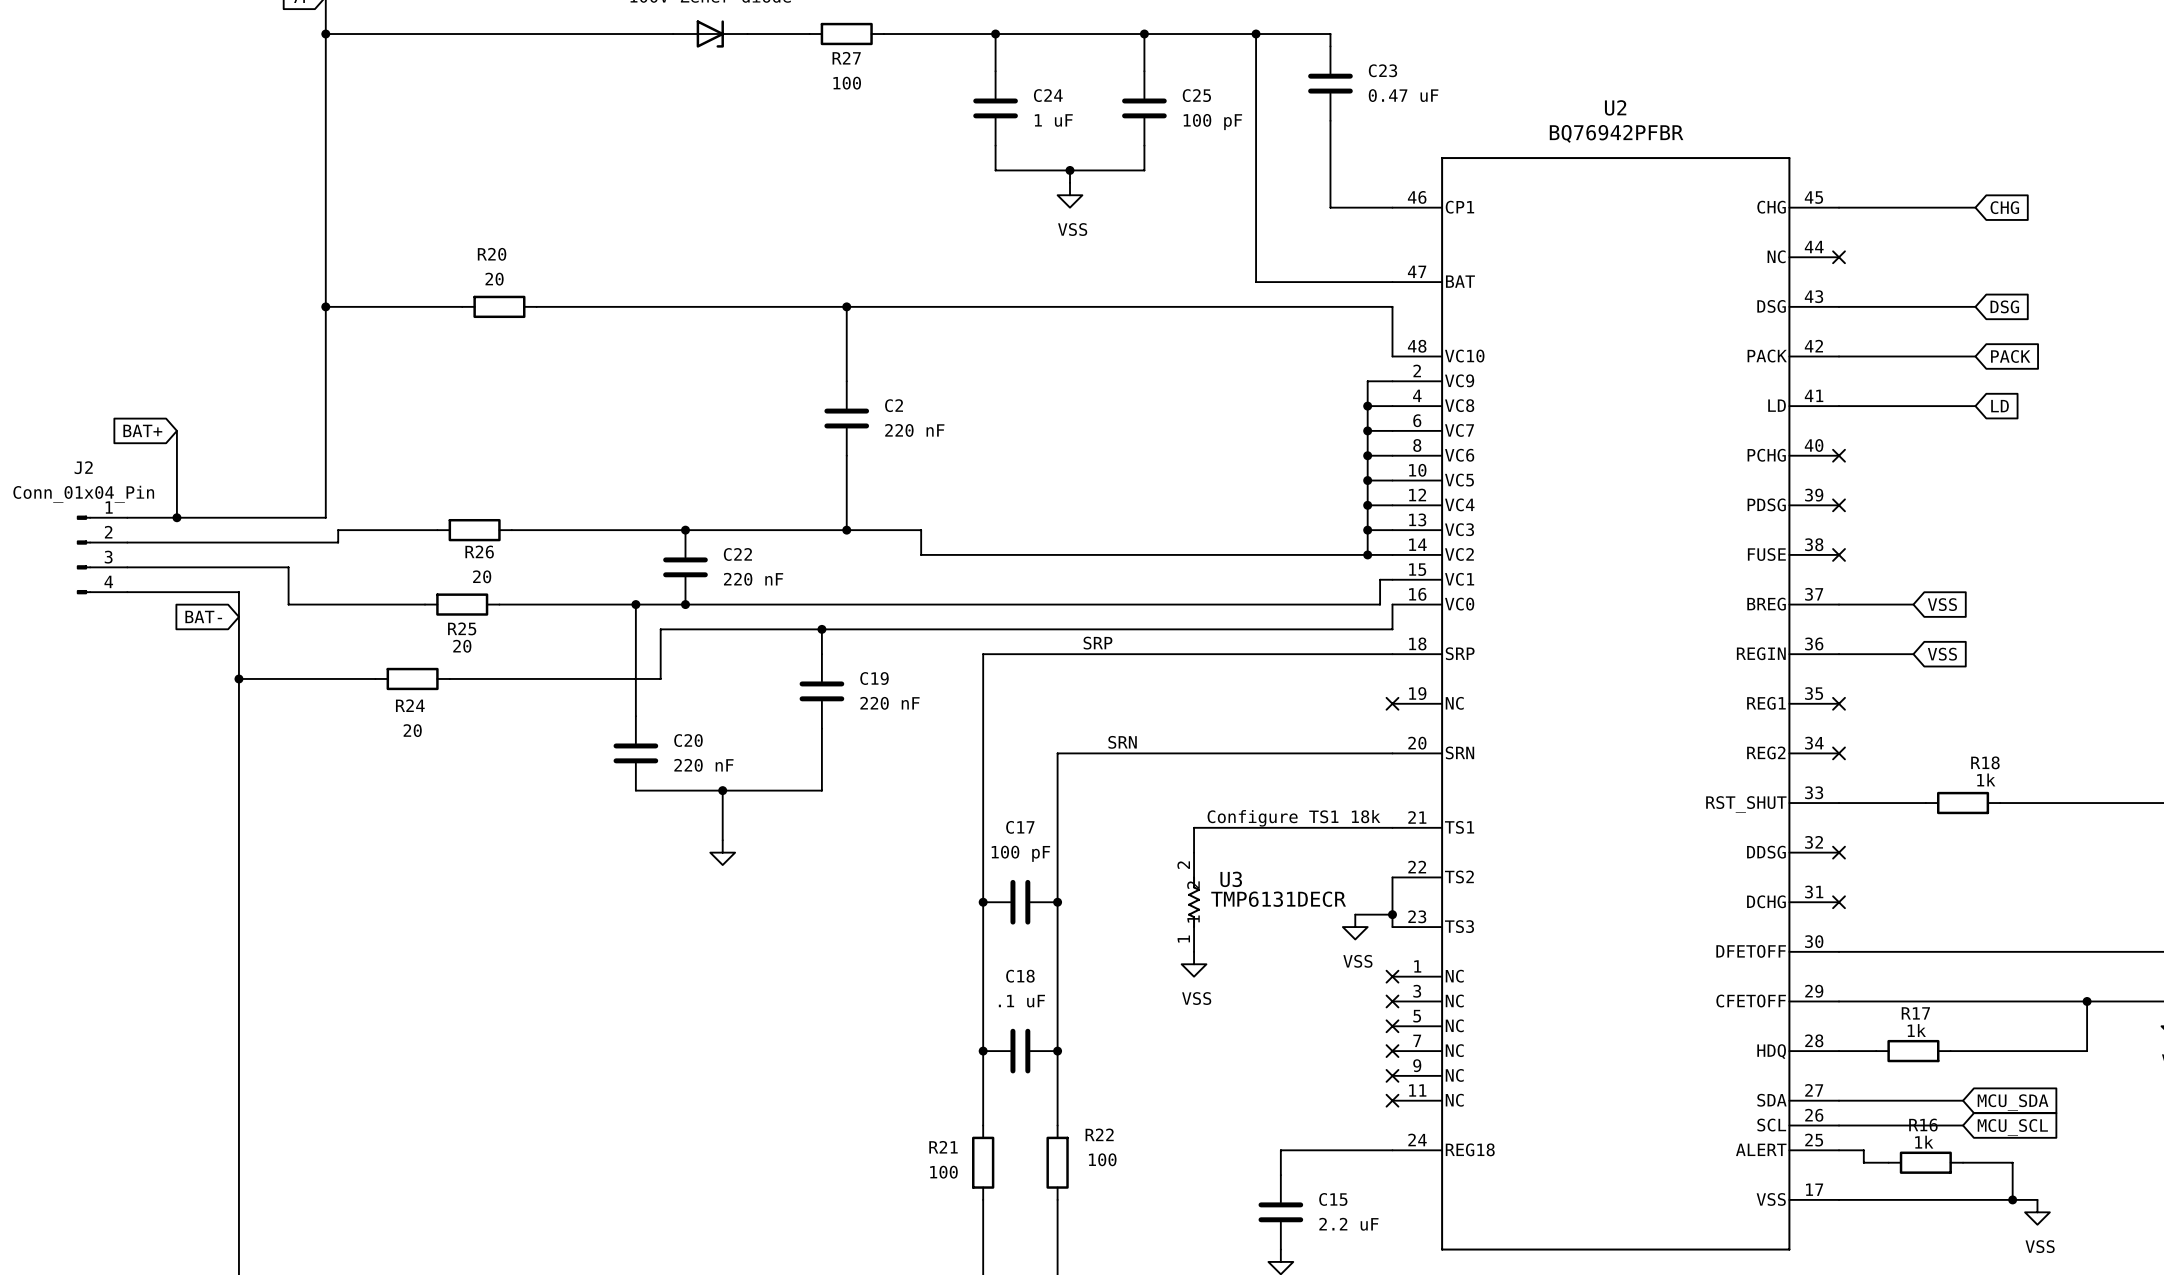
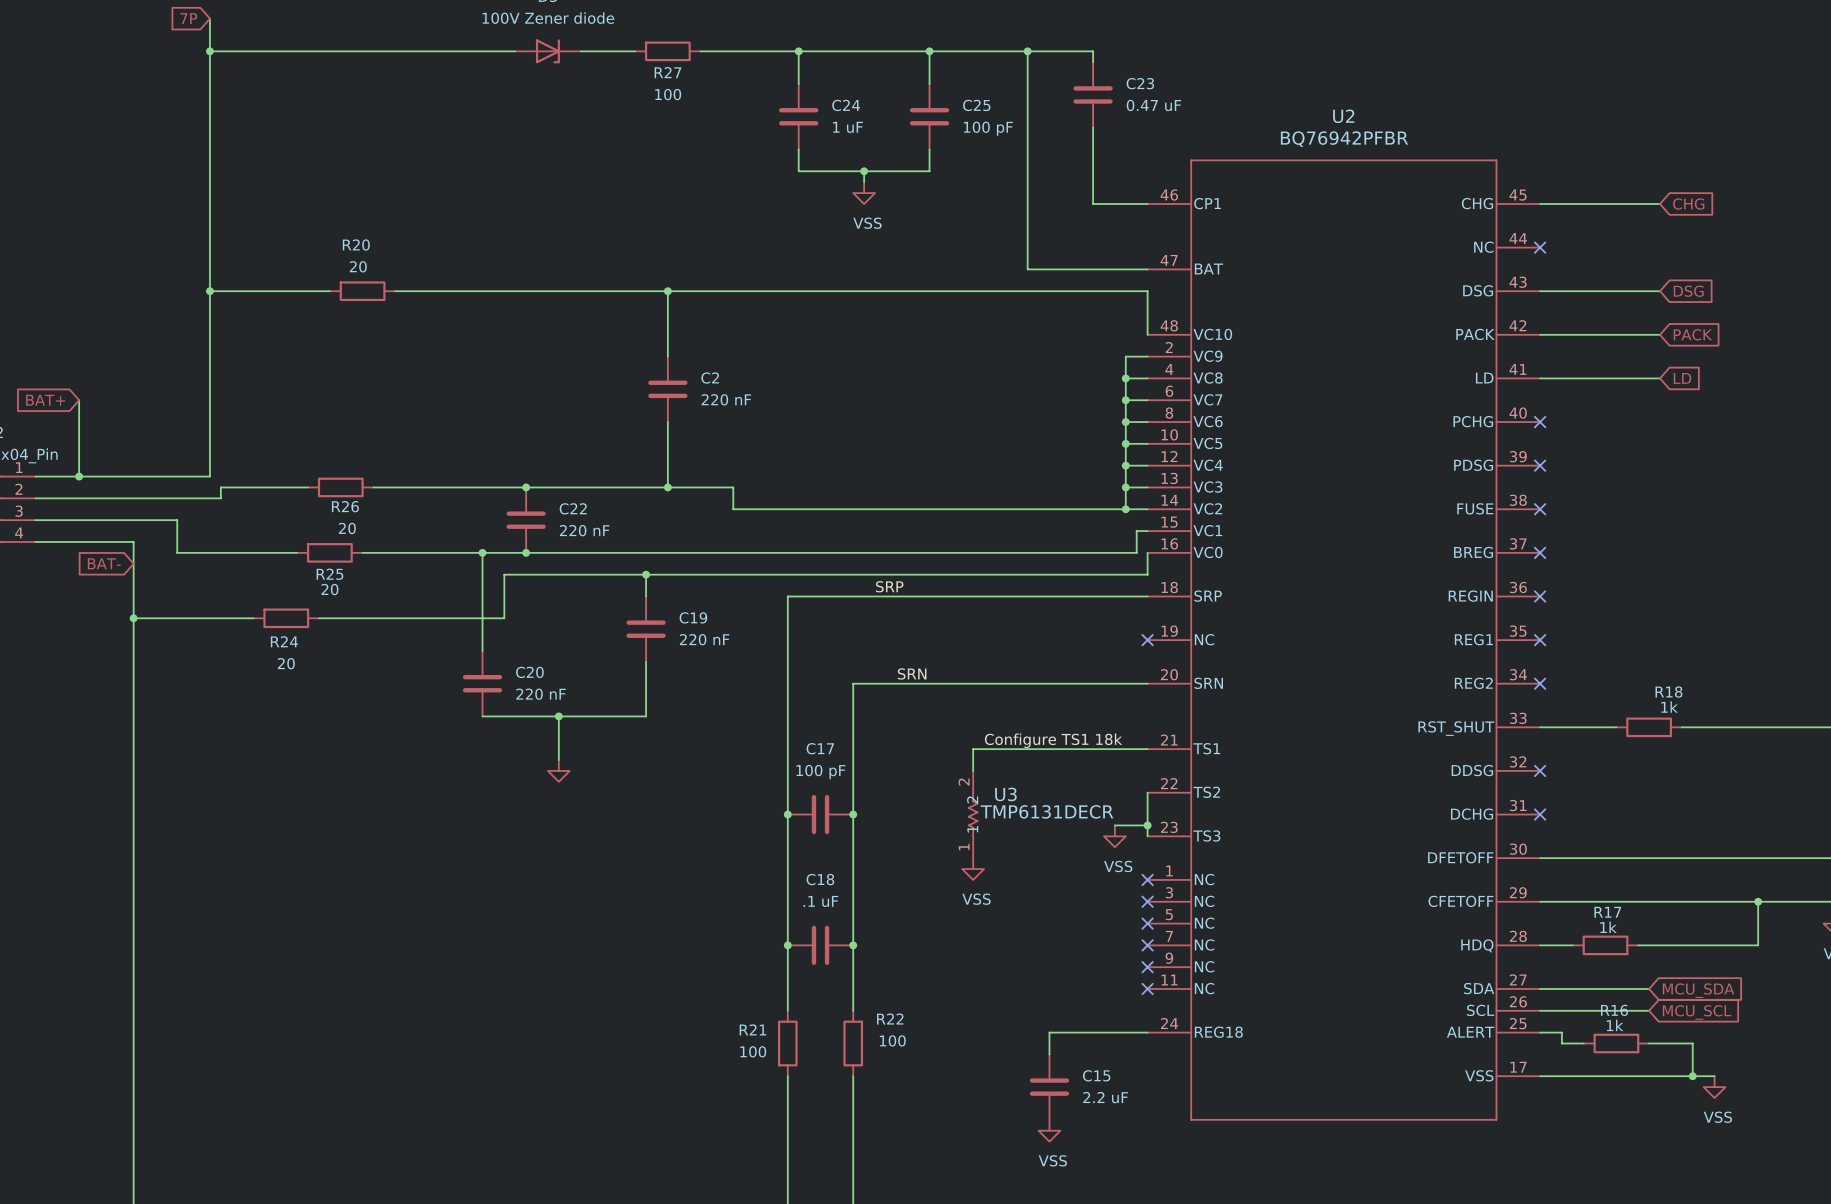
wire: (1839, 604) (1913, 604) -> none
no-connect mark: none -> (1540, 552)
global label: VSS (1942, 604) -> none
wire: (1839, 654) (1913, 654) -> none
no-connect mark: none -> (1540, 596)
global label: VSS (1942, 654) -> none

